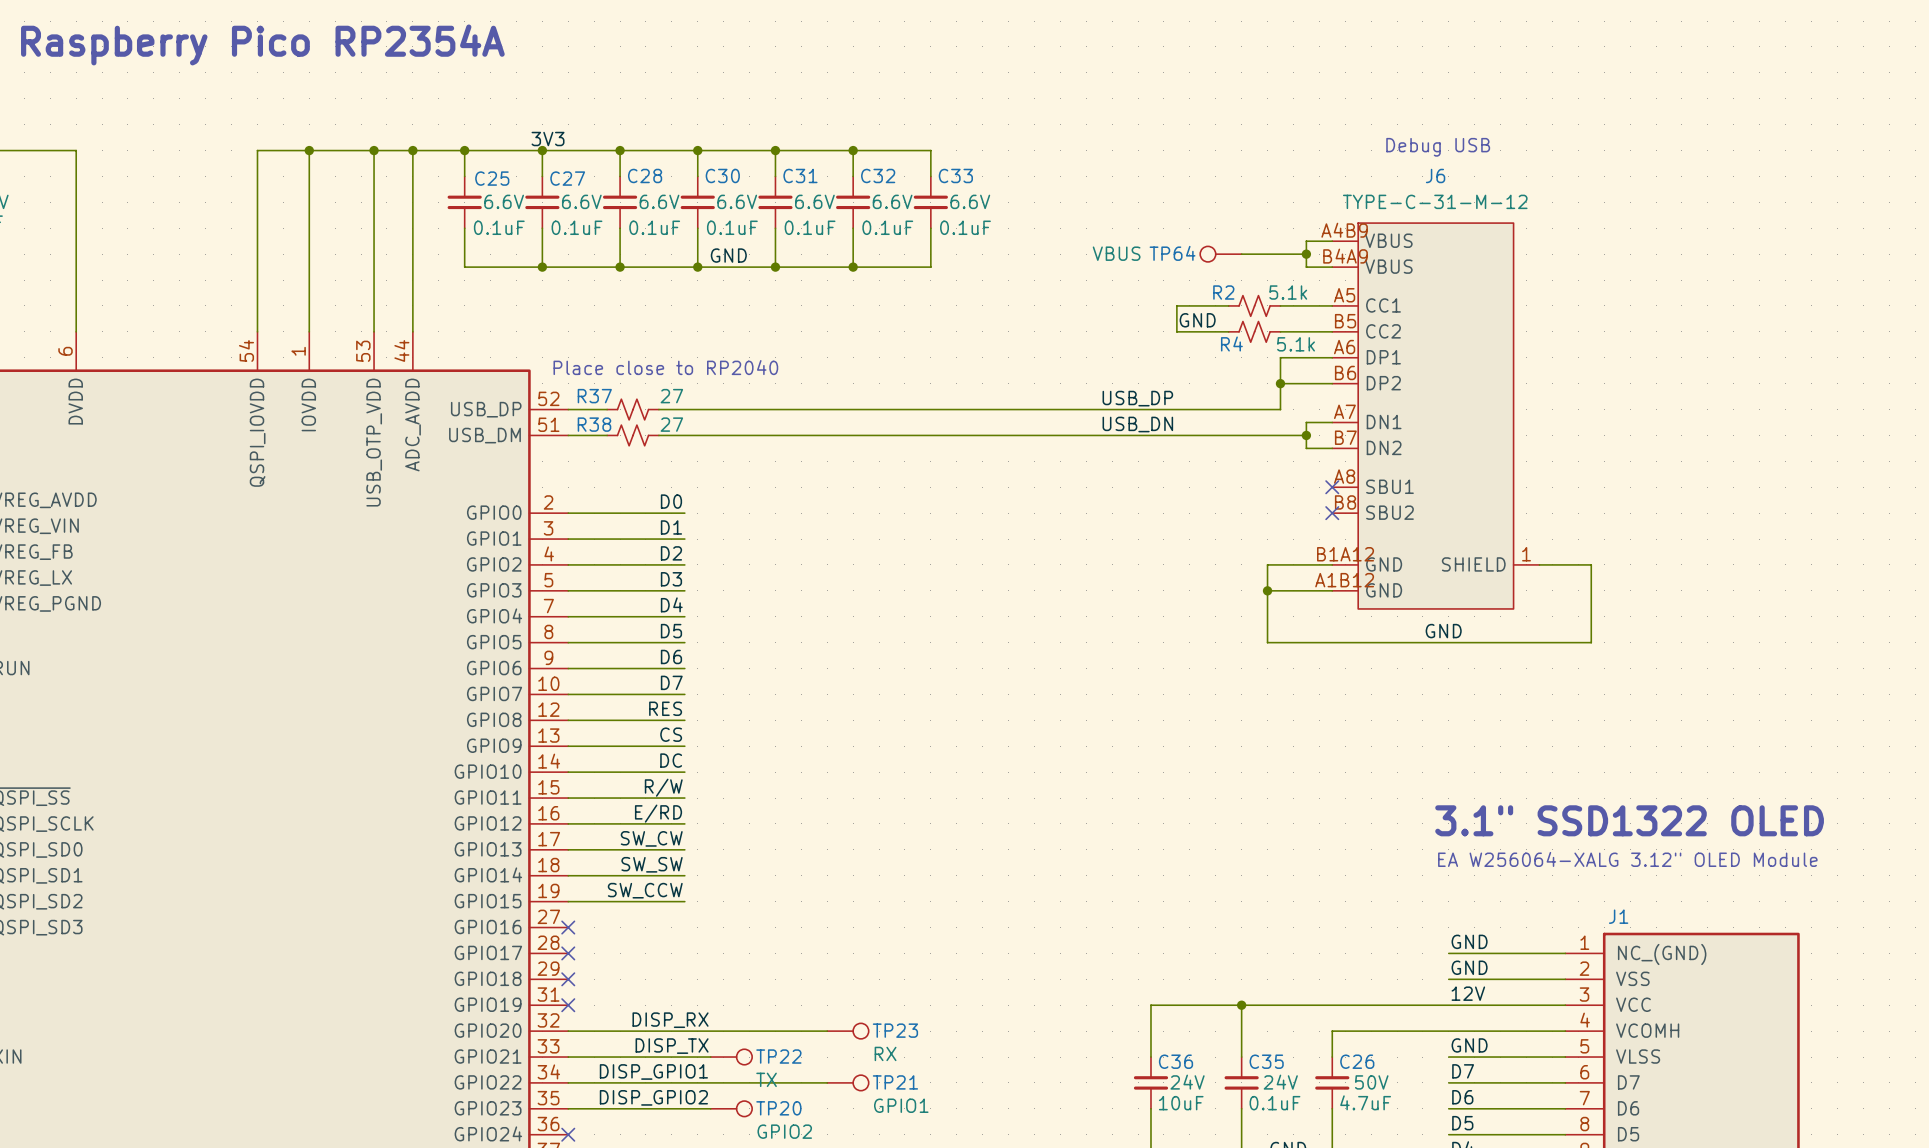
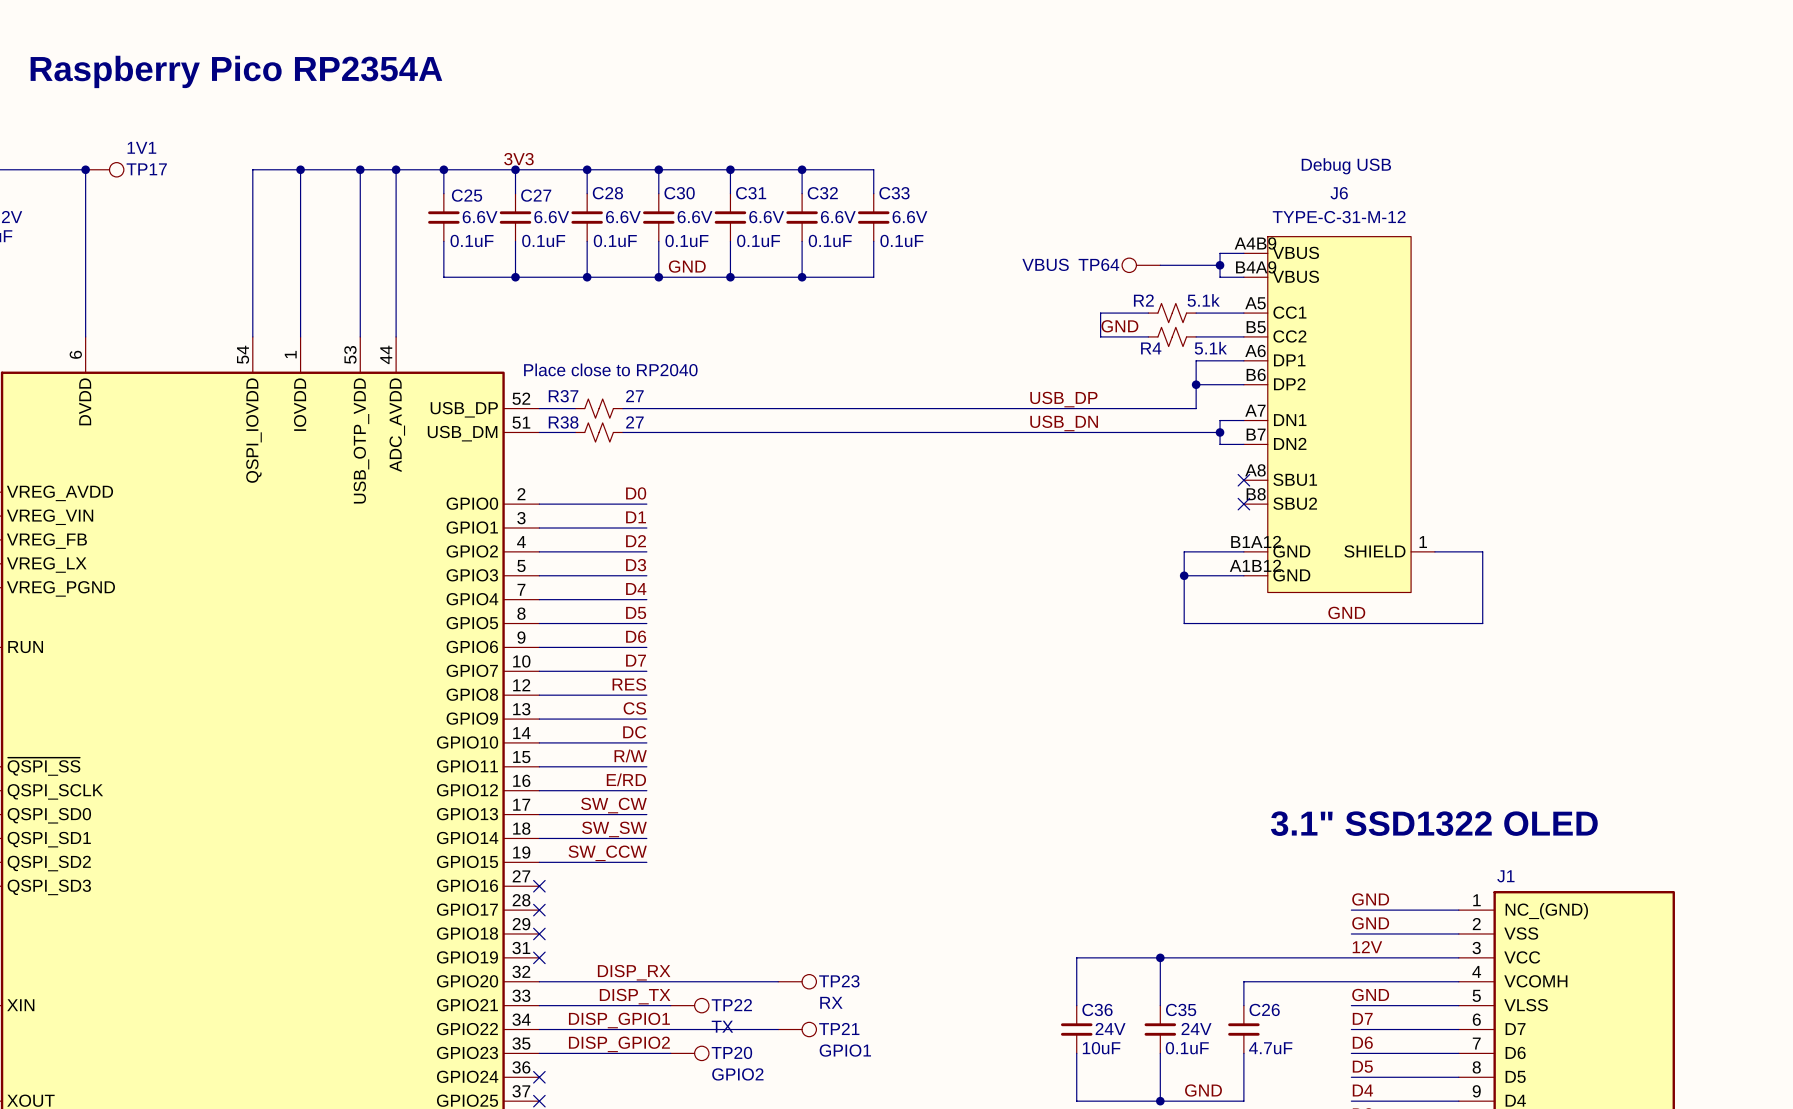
junction: none -> (85, 169)
TP17: none -> 1V1 (104, 169)
text position: 3.1" SSD1322 OLED (1629, 820) -> 3.1" SSD1322 OLED (1434, 823)
text: EA W256064-XALG 3.12" OLED Module (1627, 859) -> none
C26 text: 50V (1371, 1082) -> none

